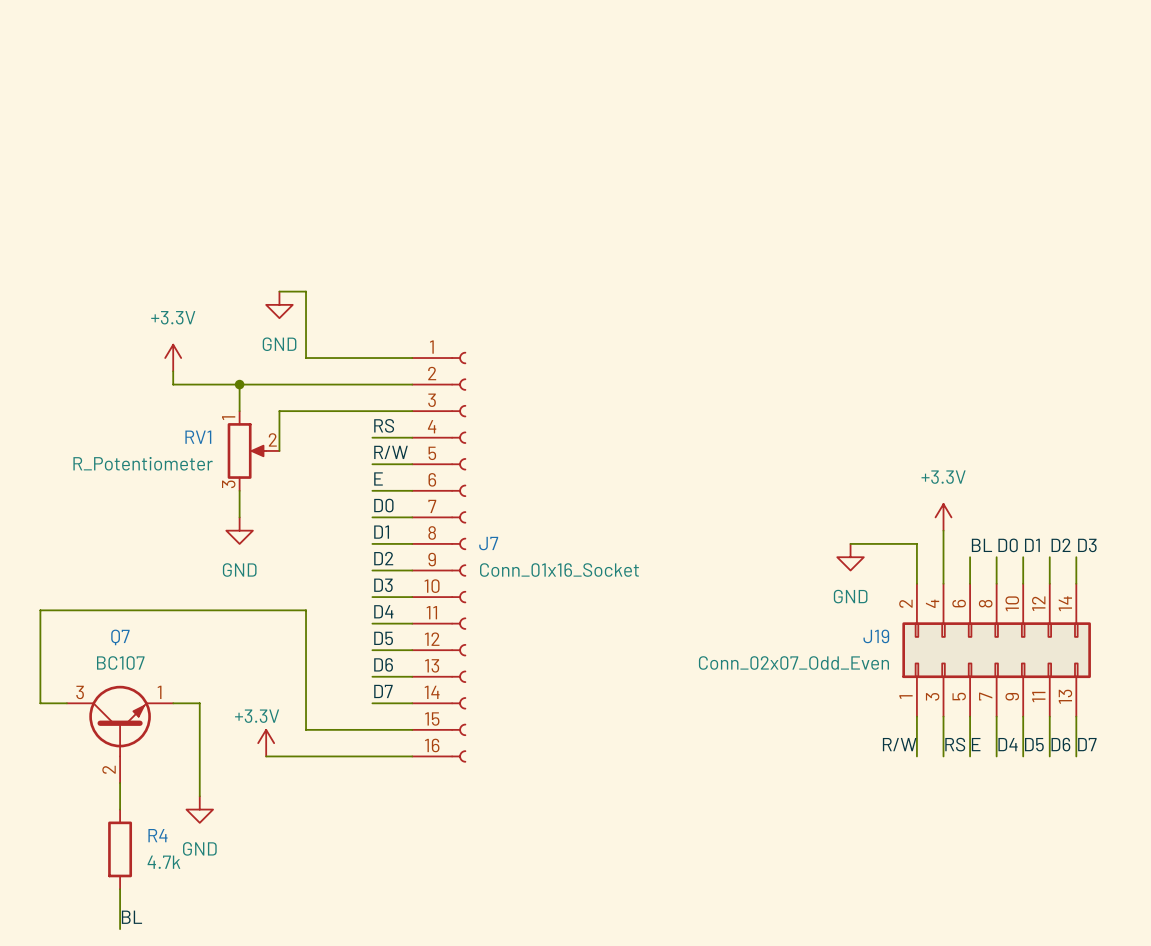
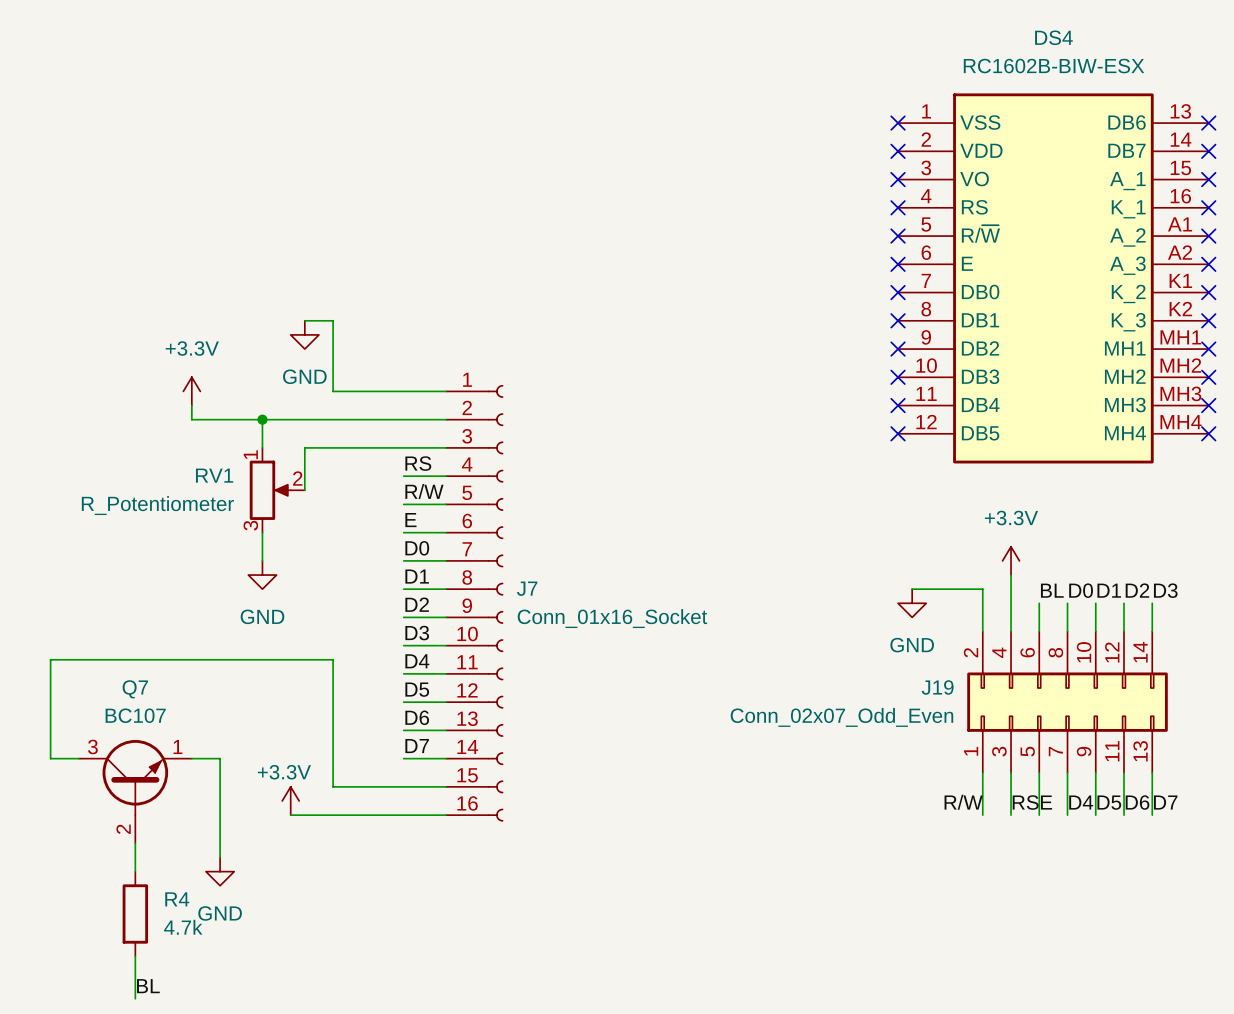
no-connect mark: none -> (898, 123)
no-connect mark: none -> (1208, 123)
no-connect mark: none -> (898, 151)
no-connect mark: none -> (1208, 151)
no-connect mark: none -> (898, 179)
no-connect mark: none -> (1208, 179)
no-connect mark: none -> (898, 207)
no-connect mark: none -> (1208, 207)
no-connect mark: none -> (898, 236)
no-connect mark: none -> (1208, 236)
no-connect mark: none -> (898, 264)
no-connect mark: none -> (1208, 264)
DS4: none -> RC1602B-BIW-ESX (1053, 278)
no-connect mark: none -> (898, 292)
no-connect mark: none -> (1208, 292)
no-connect mark: none -> (898, 320)
no-connect mark: none -> (1208, 320)
no-connect mark: none -> (898, 349)
no-connect mark: none -> (1208, 349)
no-connect mark: none -> (898, 377)
no-connect mark: none -> (1208, 377)
no-connect mark: none -> (898, 405)
no-connect mark: none -> (1208, 405)
no-connect mark: none -> (898, 433)
no-connect mark: none -> (1208, 433)

